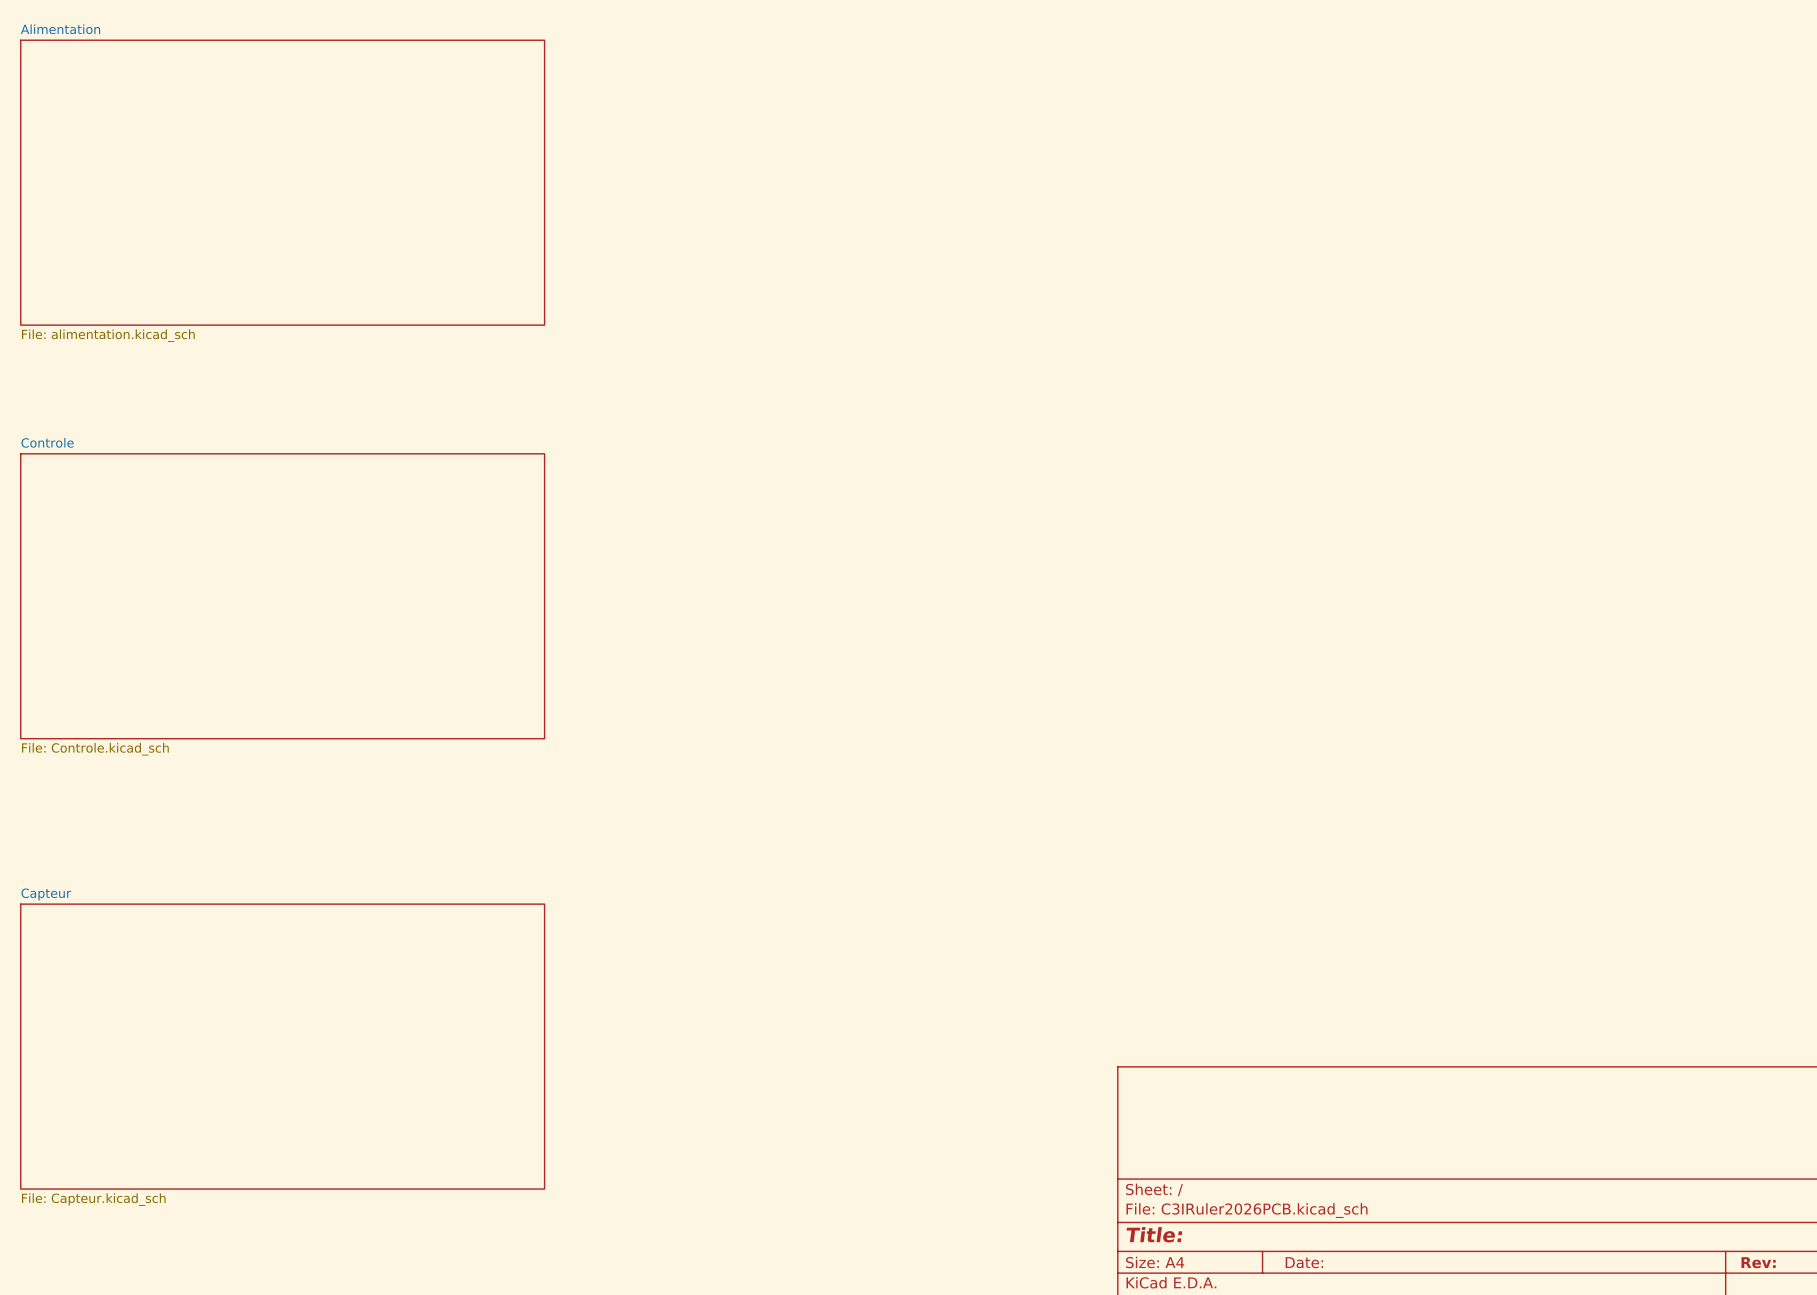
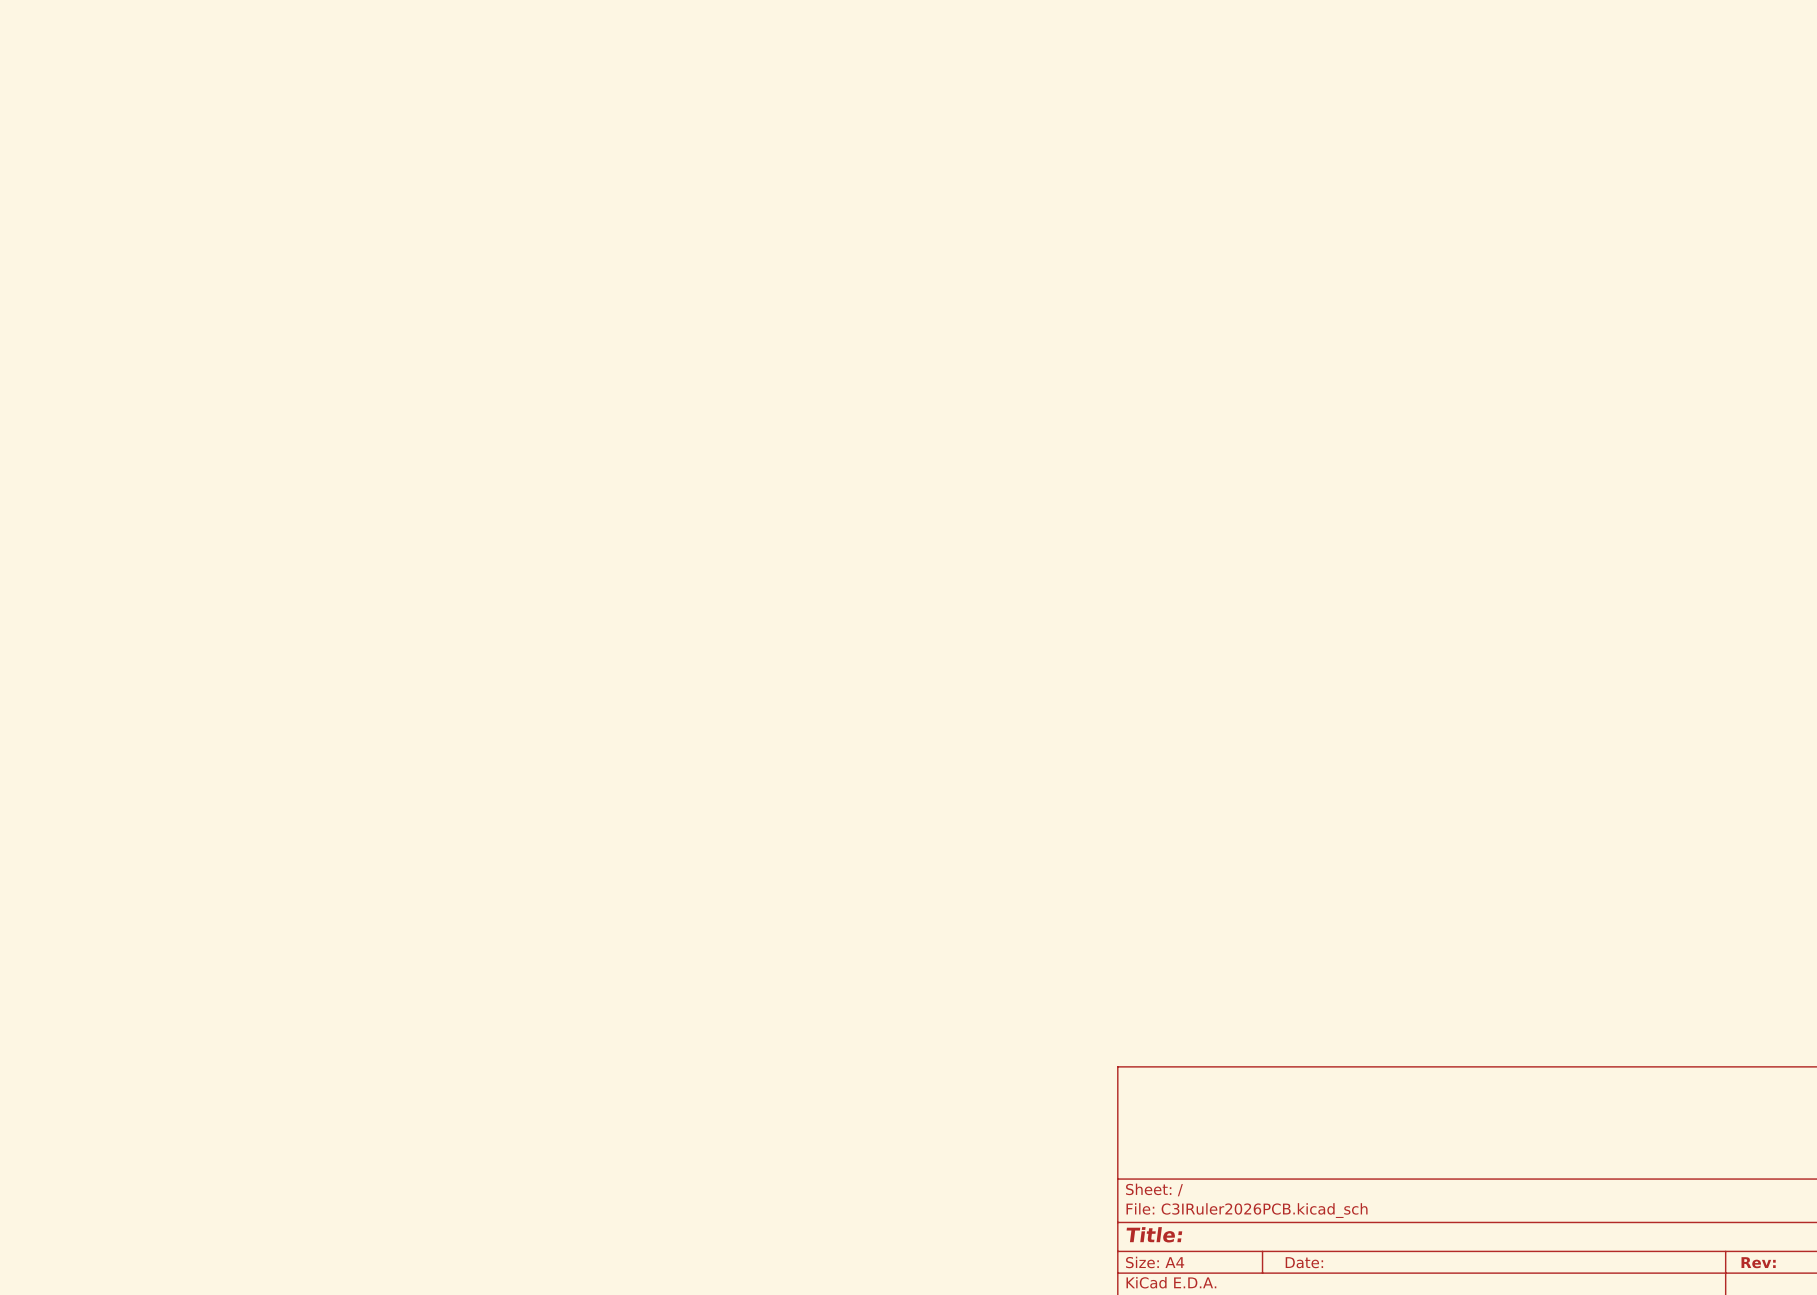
sheet Alimentation: File: alimentation.kicad_sch (282, 182) -> none
sheet Controle: File: Controle.kicad_sch (282, 596) -> none
sheet Capteur: File: Capteur.kicad_sch (282, 1046) -> none

